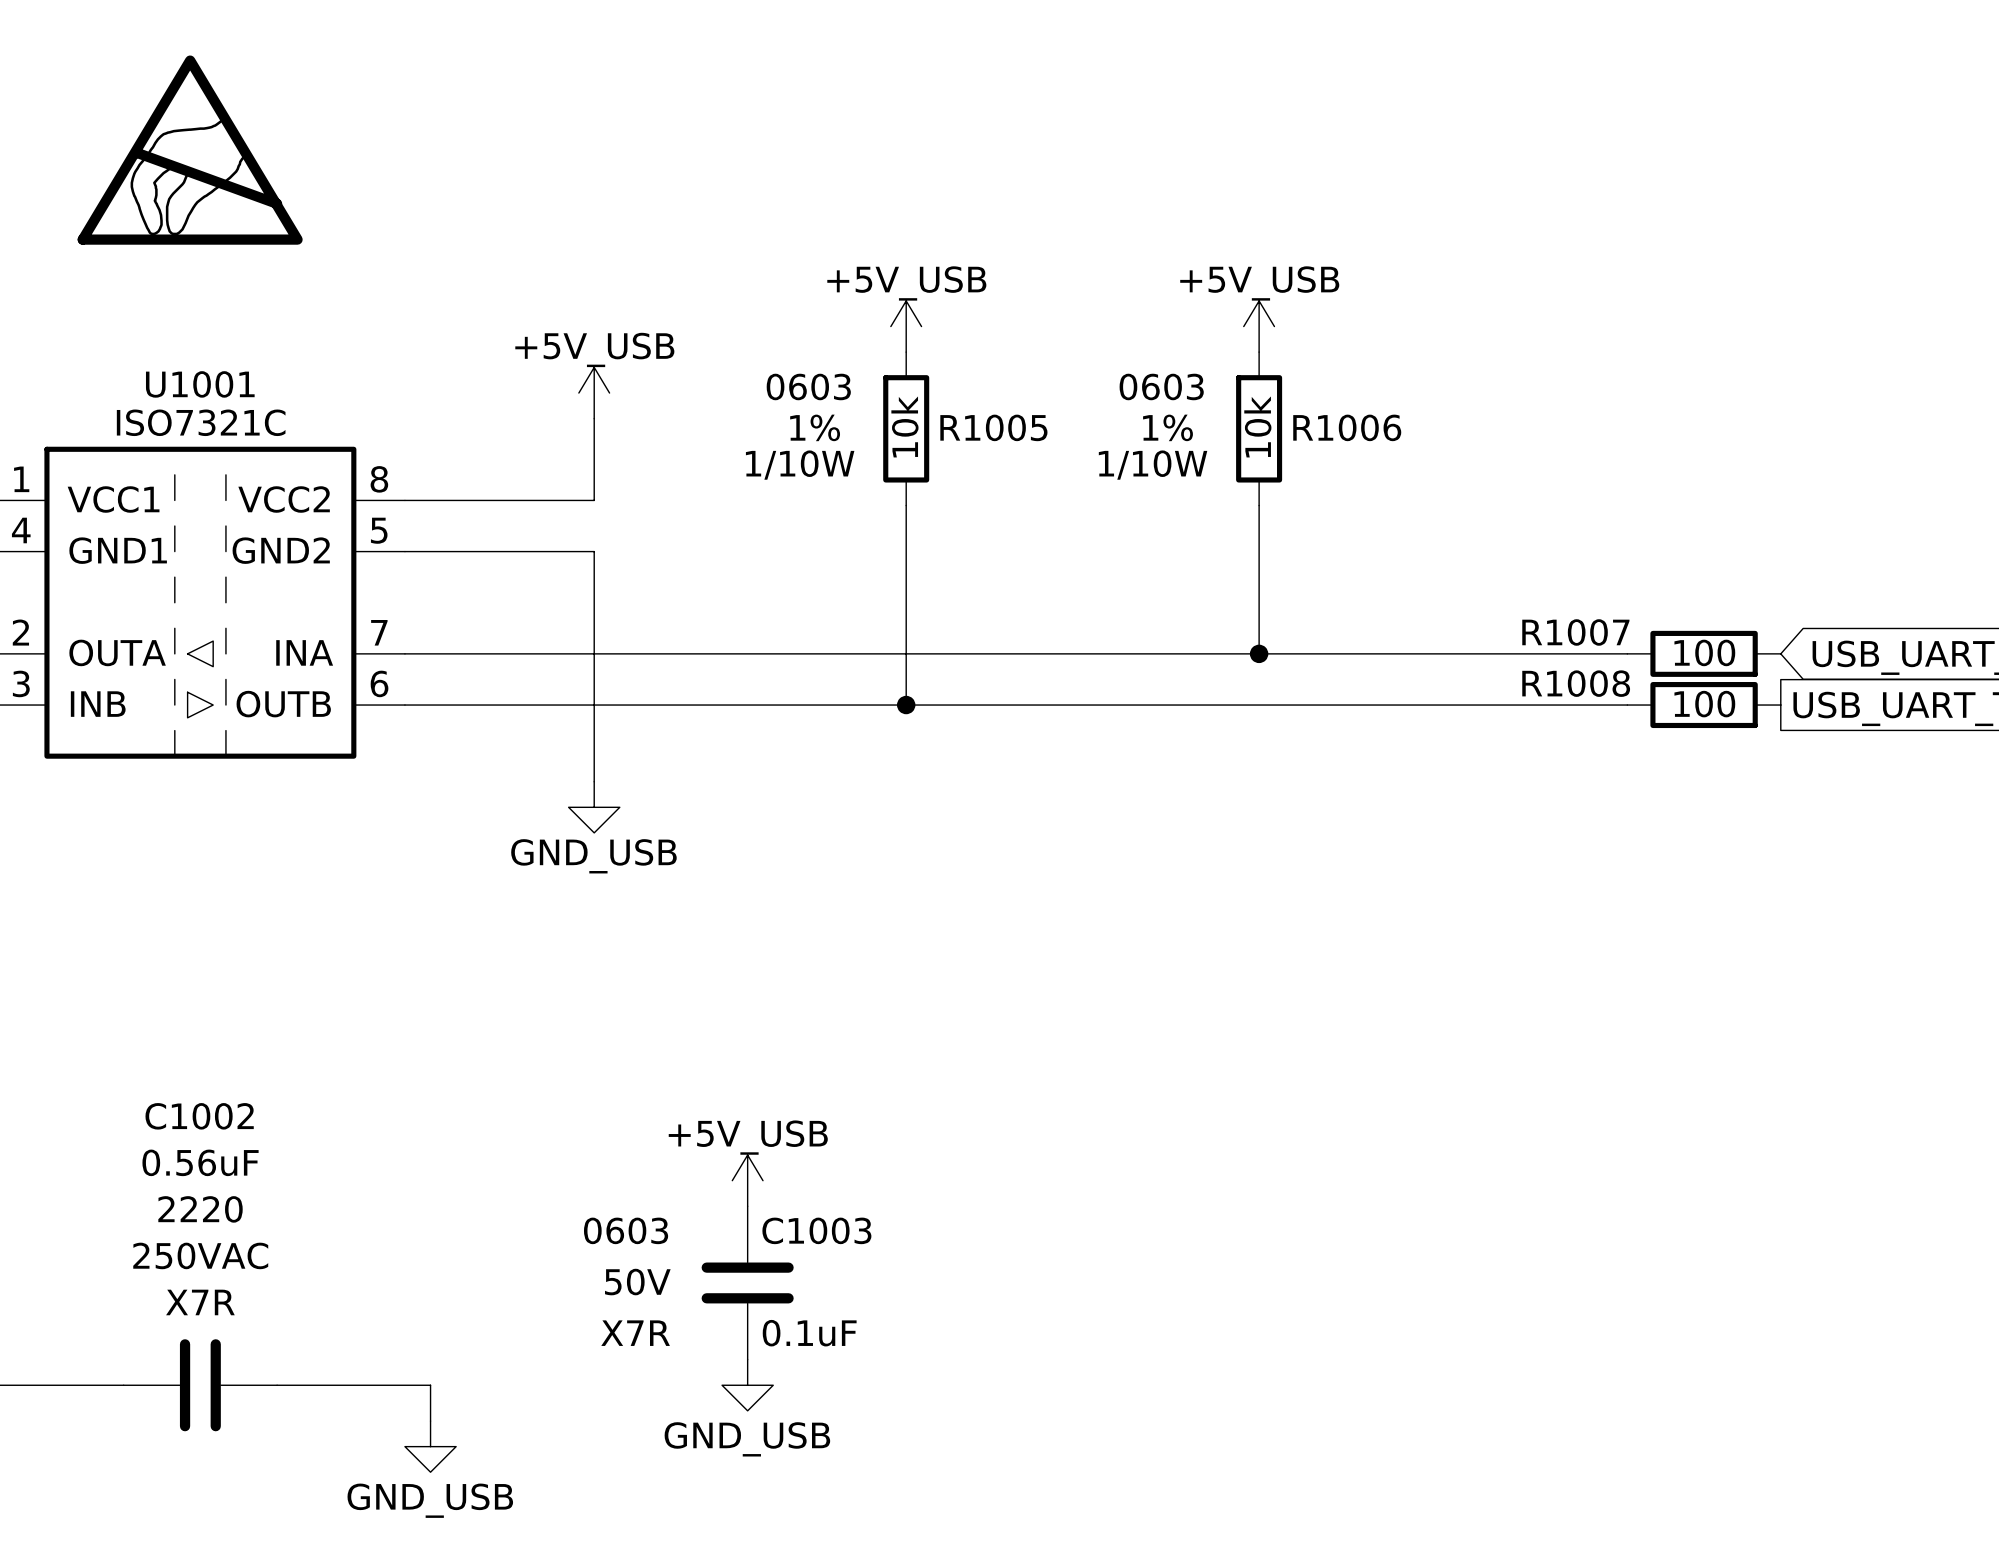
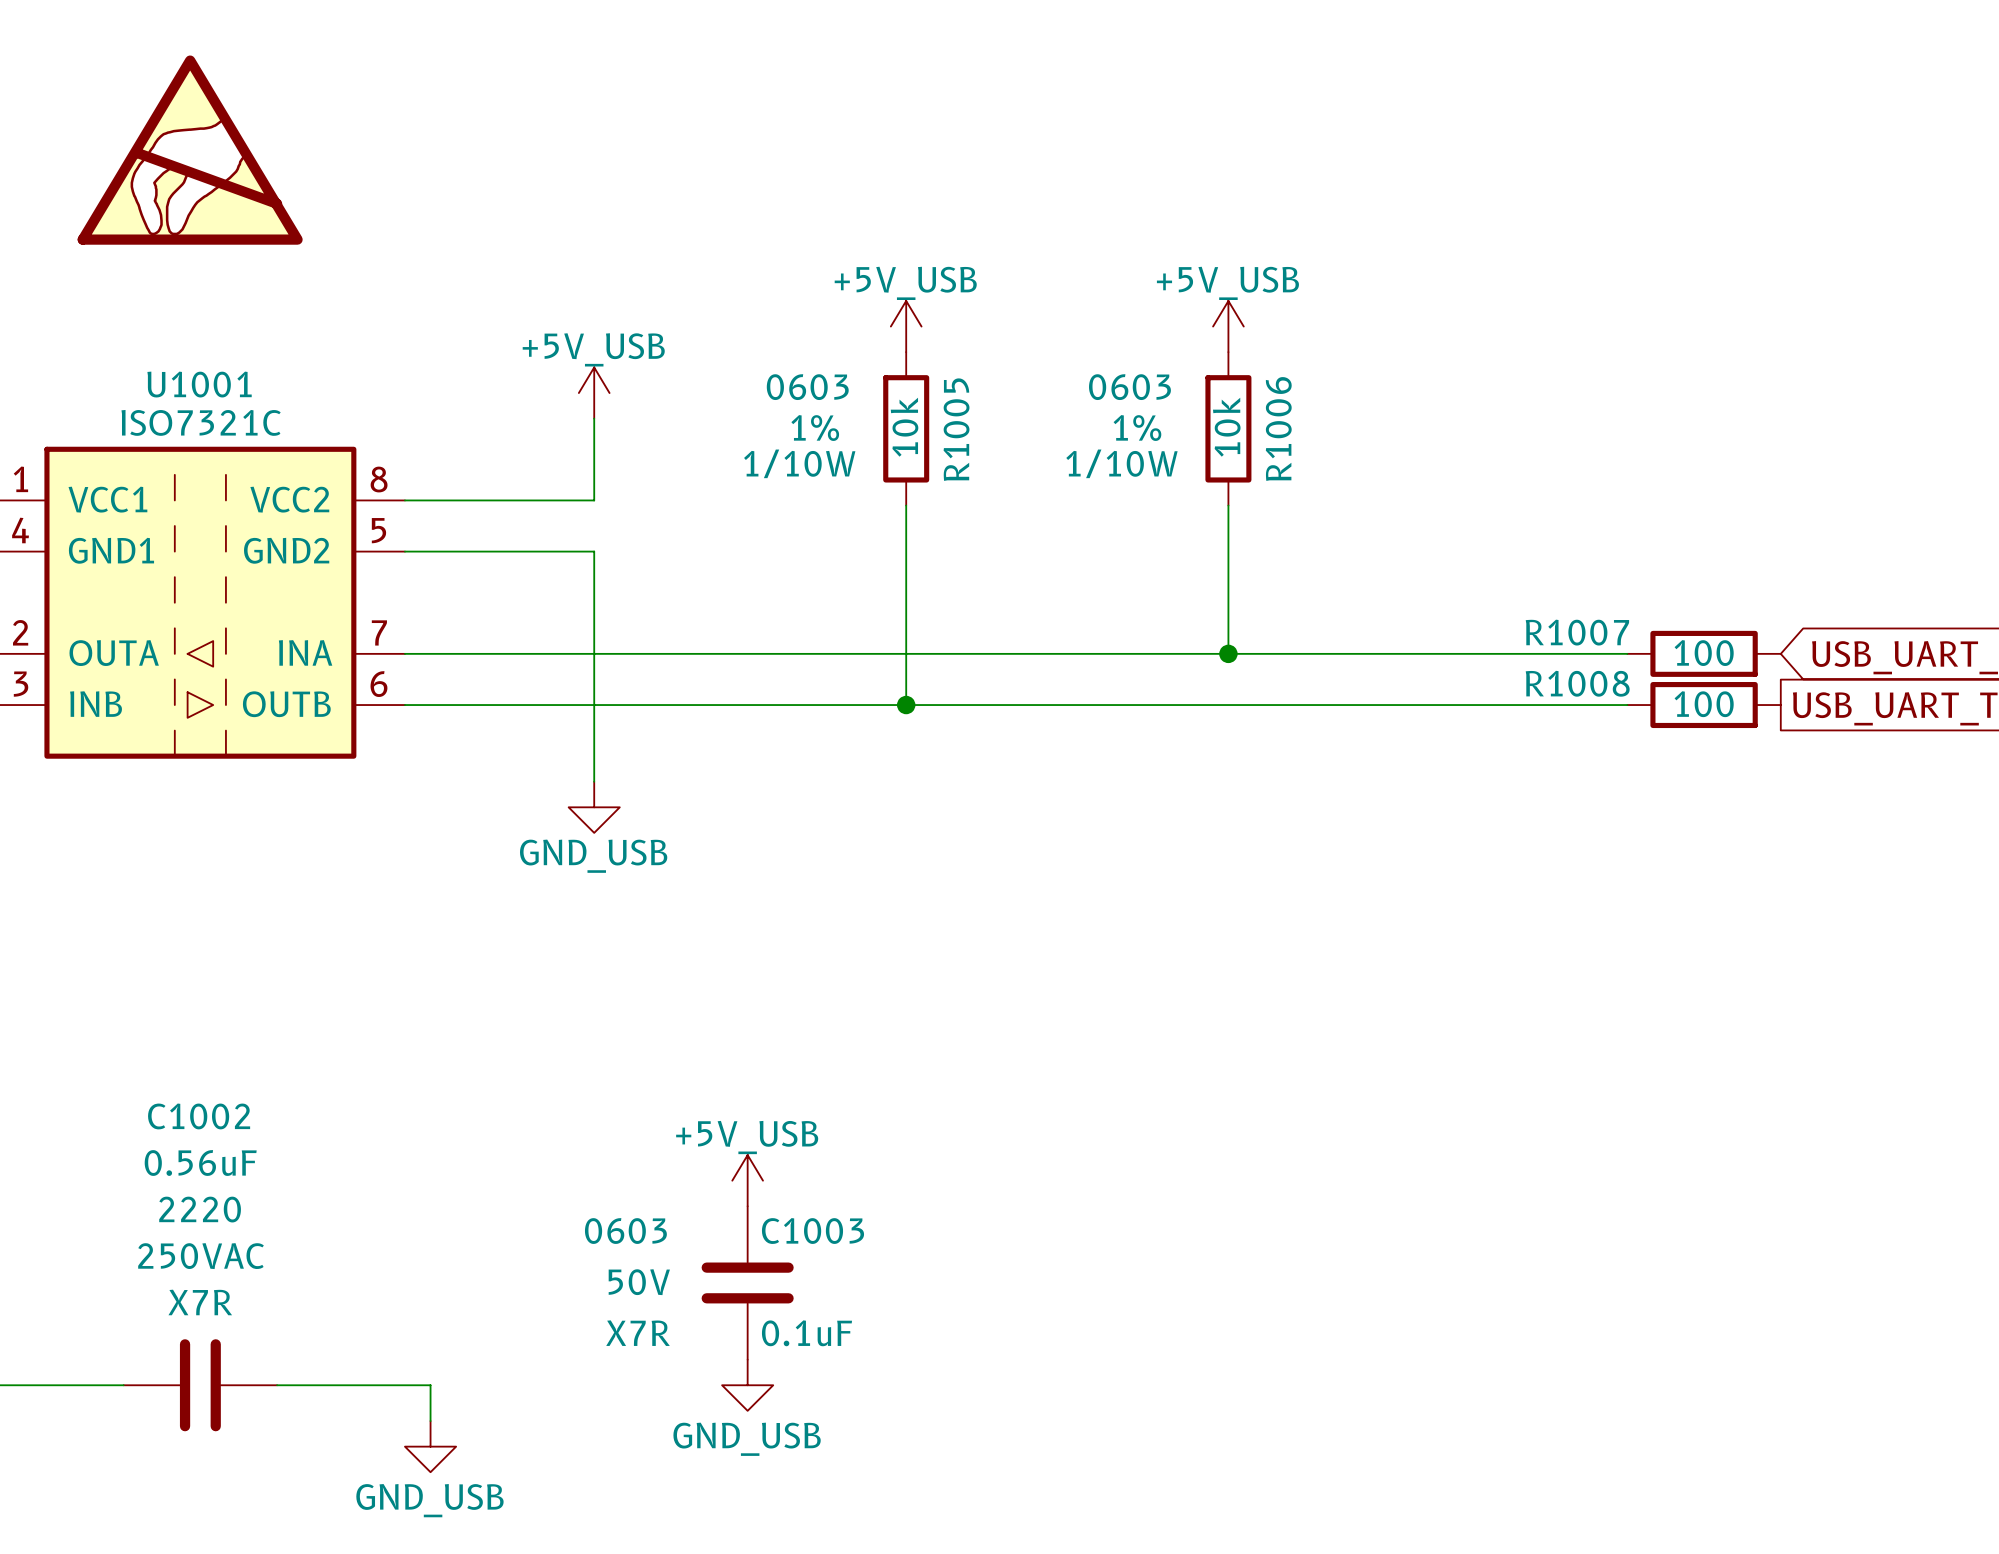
power symbol position: +5V_USB (1259, 326) -> +5V_USB (1228, 326)
R1005 name rotation: 0° (993, 427) -> 90° counterclockwise (956, 429)
R1006 name rotation: 0° (1347, 427) -> 90° counterclockwise (1278, 428)
R1006 position: (1259, 428) -> (1228, 428)
wire: (1259, 505) (1259, 653) -> (1228, 505) (1228, 653)
junction position: (1259, 653) -> (1228, 653)

